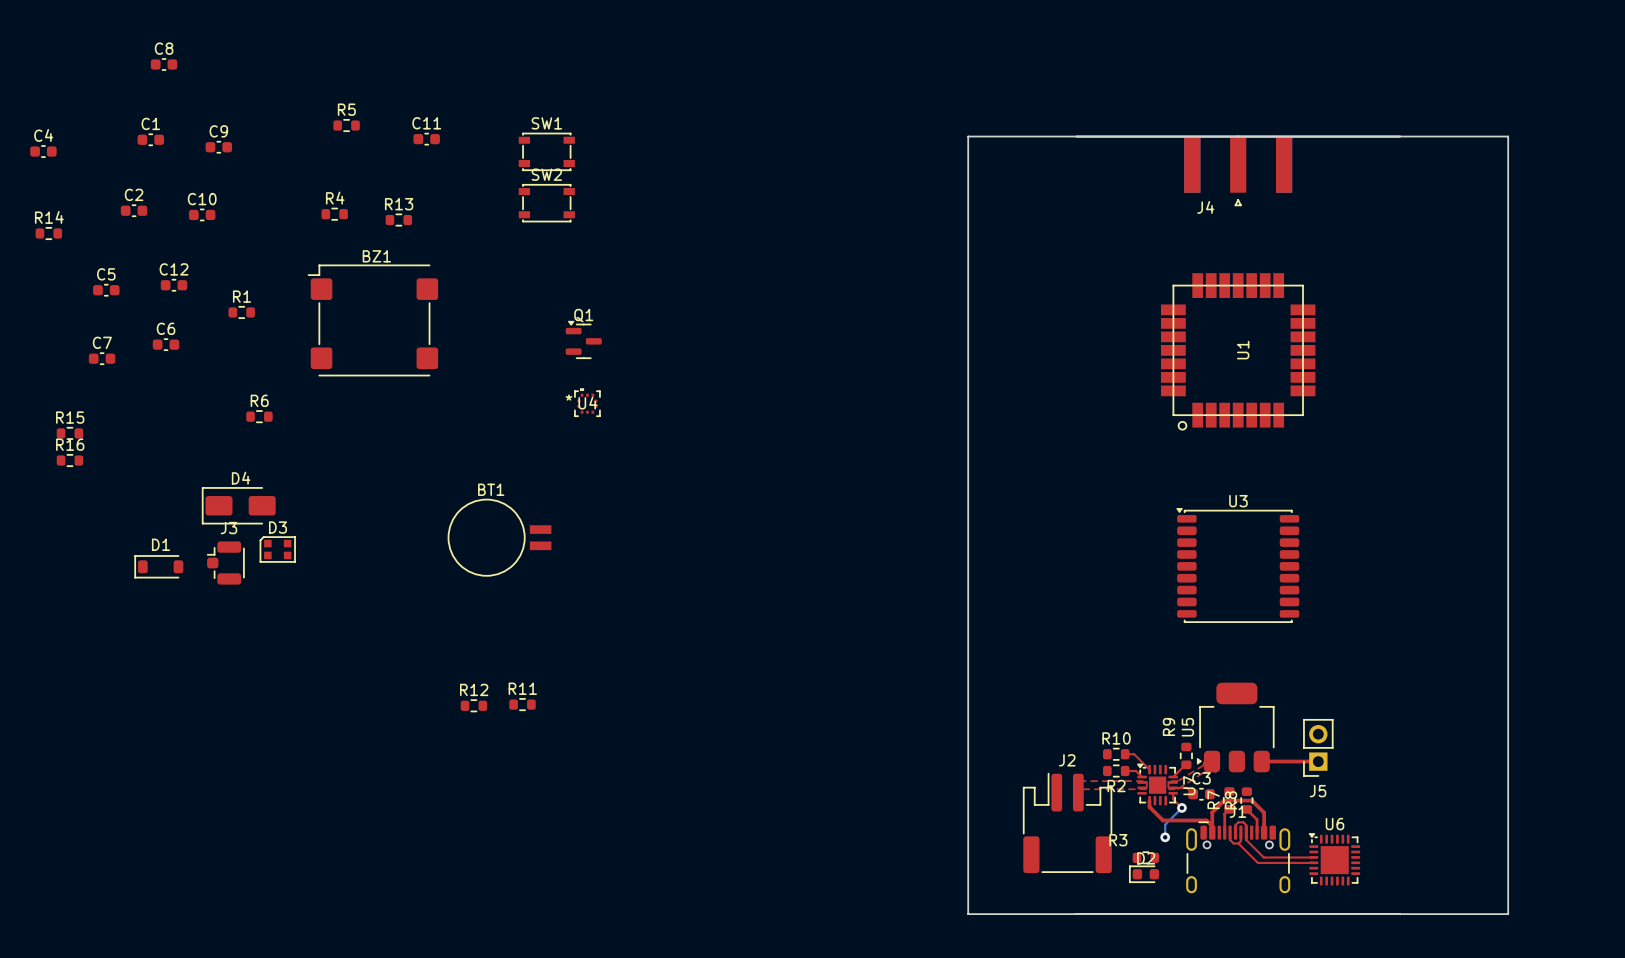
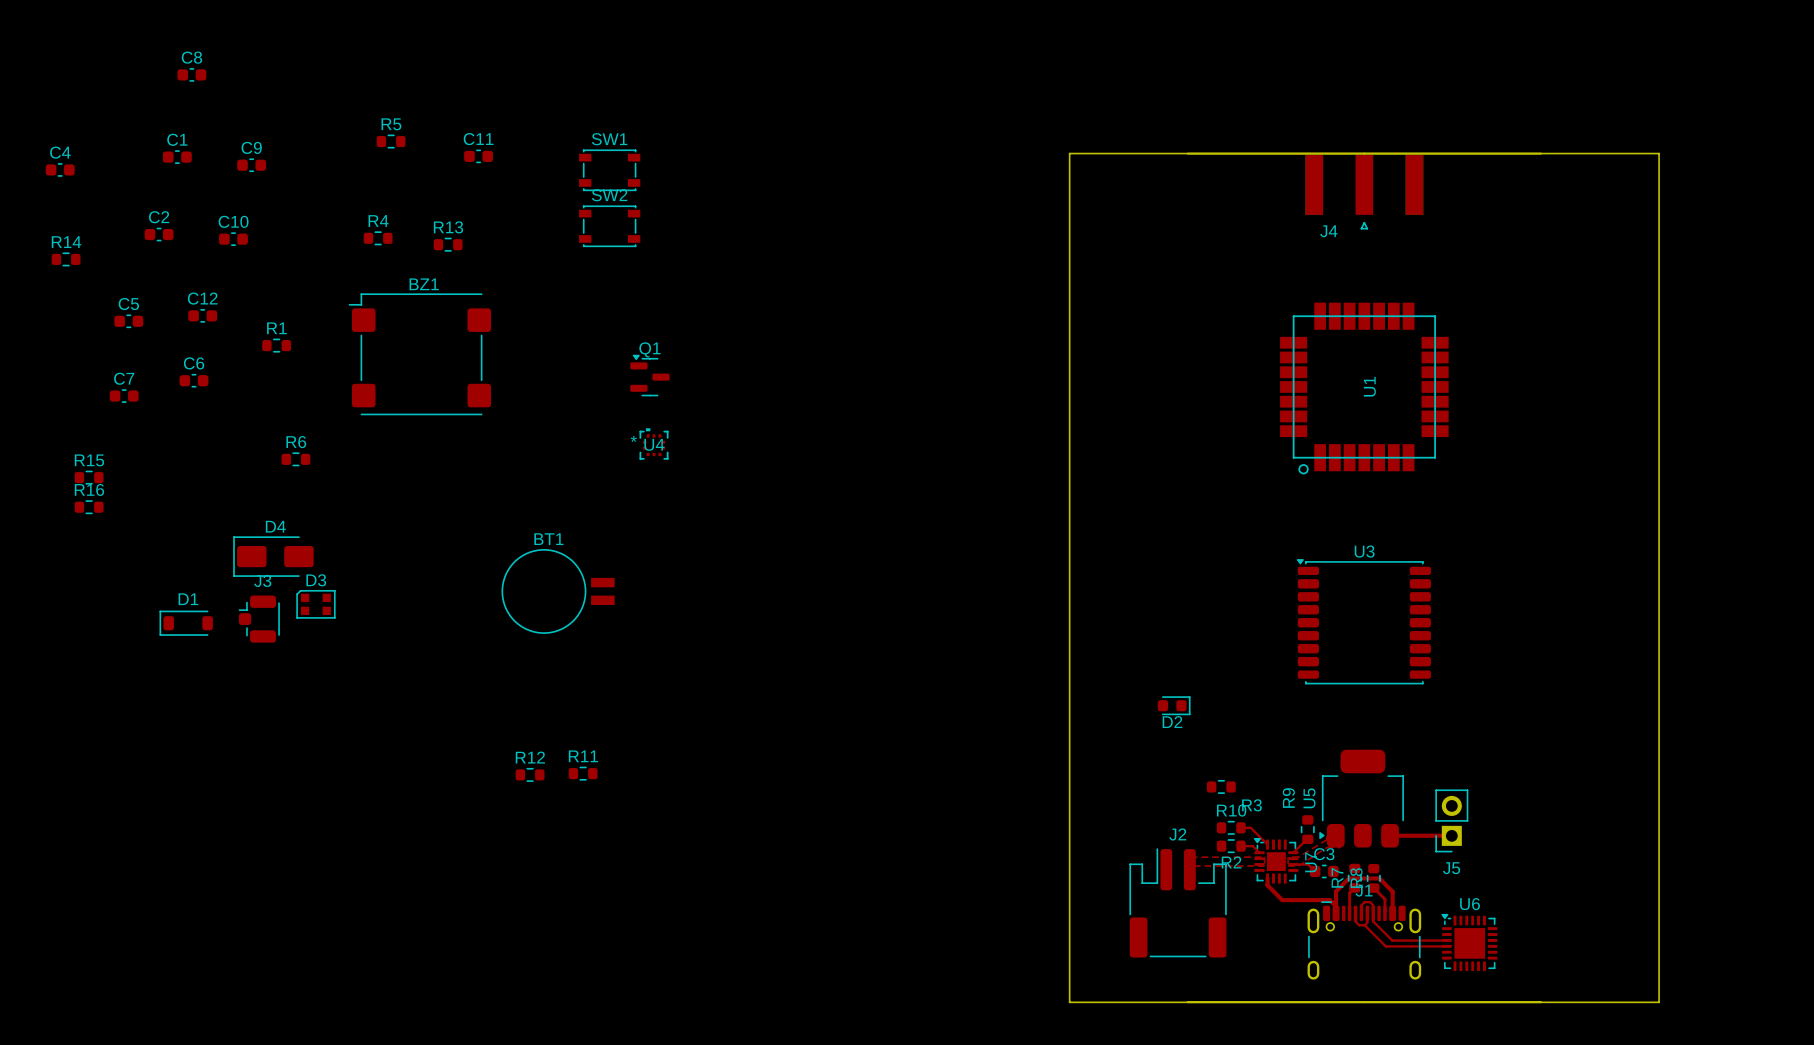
top track: (1173, 793) (1173, 799) (1181, 807) -> none
bottom track: (1181, 807) (1165, 824) (1165, 837) -> none
via: (1181, 807) -> none
via: (1165, 837) -> none
R3 name position: R3 (1118, 840) -> R3 (1251, 805)
R3 position: (1145, 857) -> (1221, 786)
D2 rotation: 0° (1144, 874) -> 180° (1174, 705)
D2 position: (1144, 874) -> (1174, 705)

